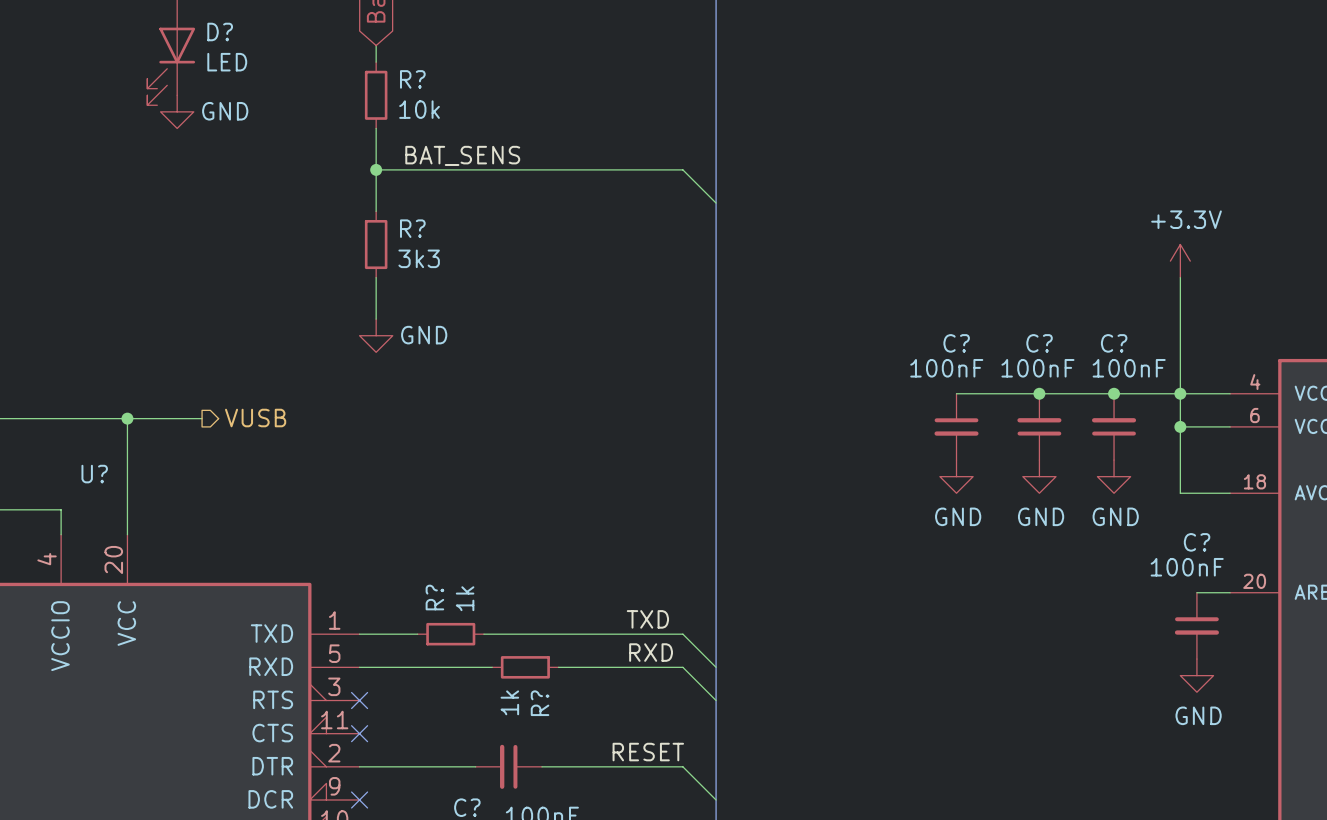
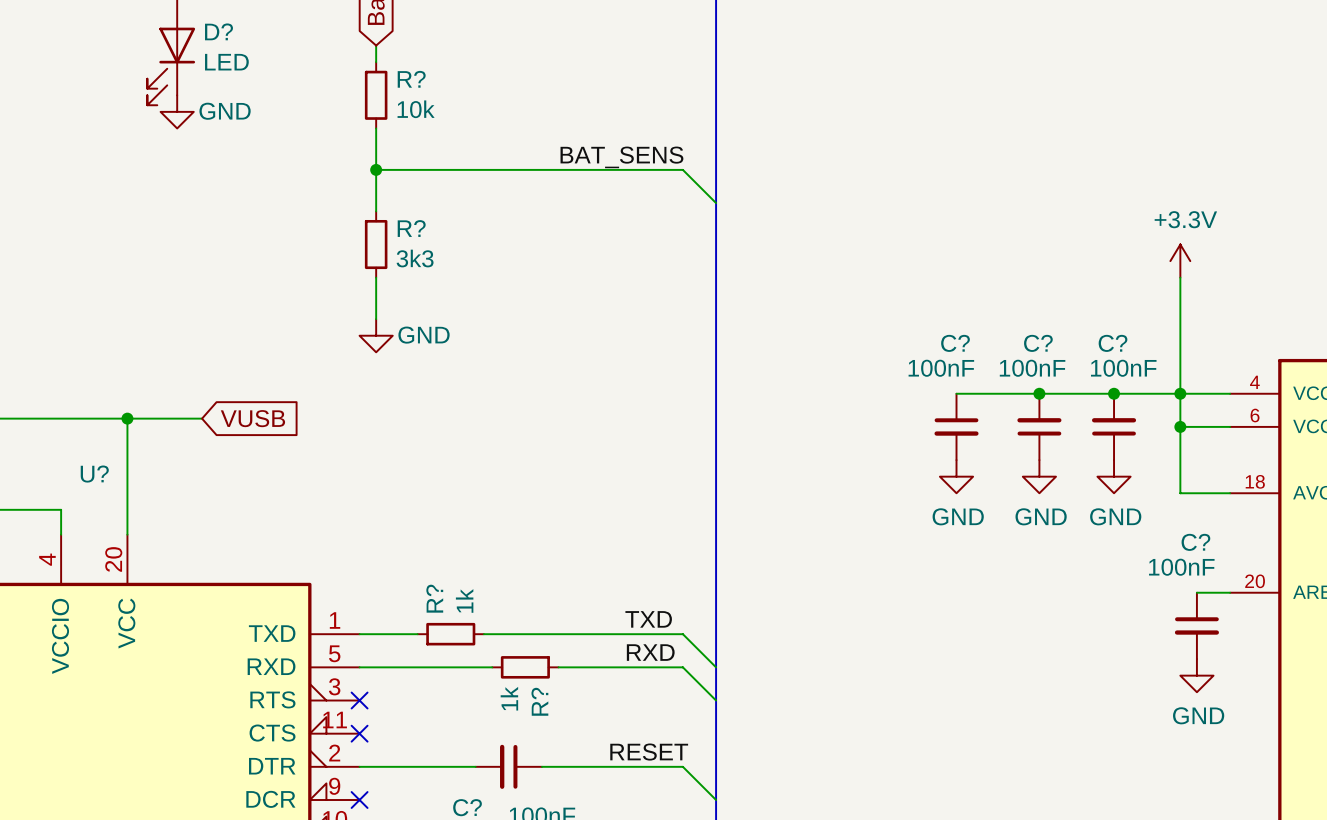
label position: BAT_SENS (462, 155) -> BAT_SENS (621, 157)
global label: none -> VUSB (252, 418)
hierarchical label: VUSB (255, 418) -> none

